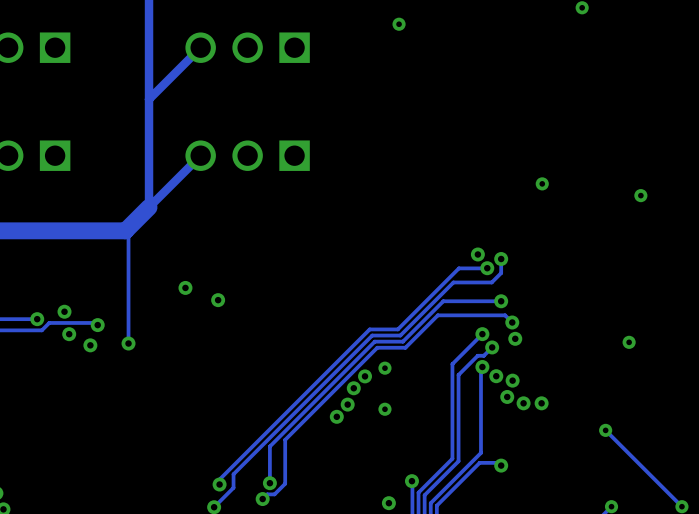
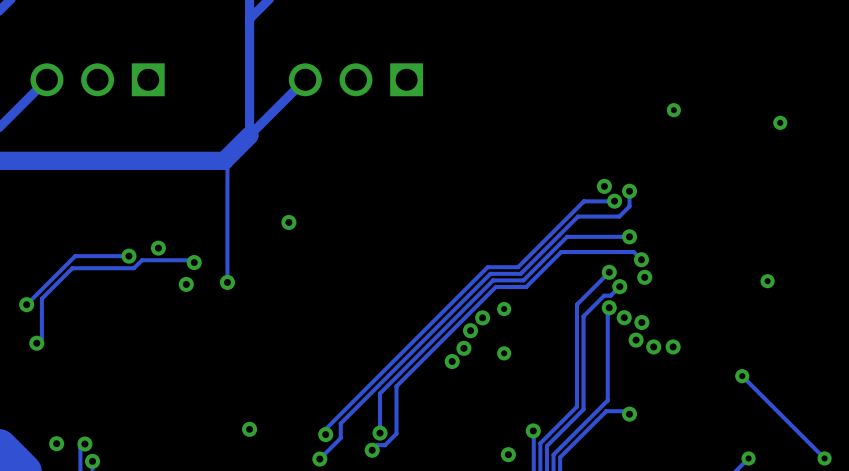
via: (218, 300) -> none
via: (69, 334) -> none
via: none -> (249, 429)

